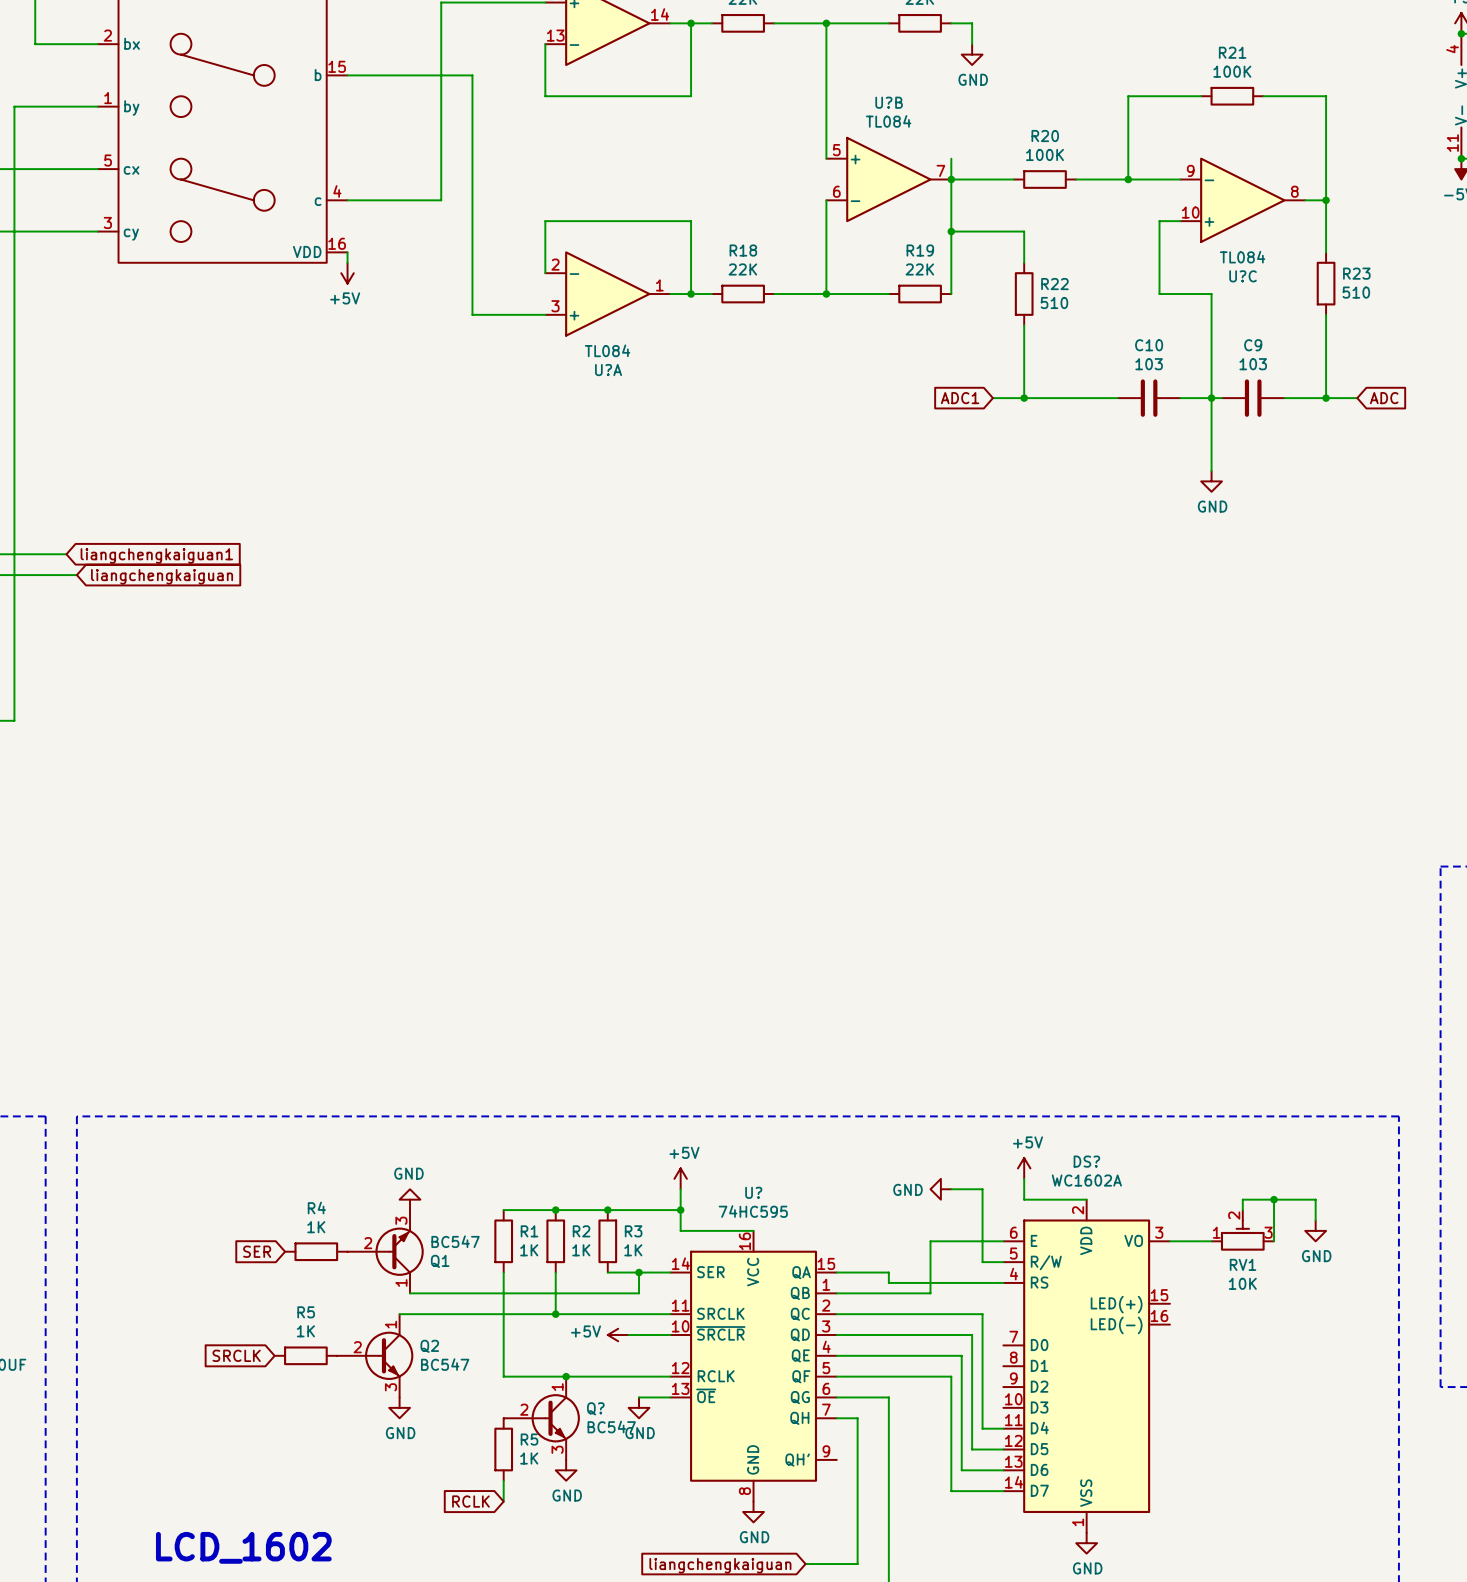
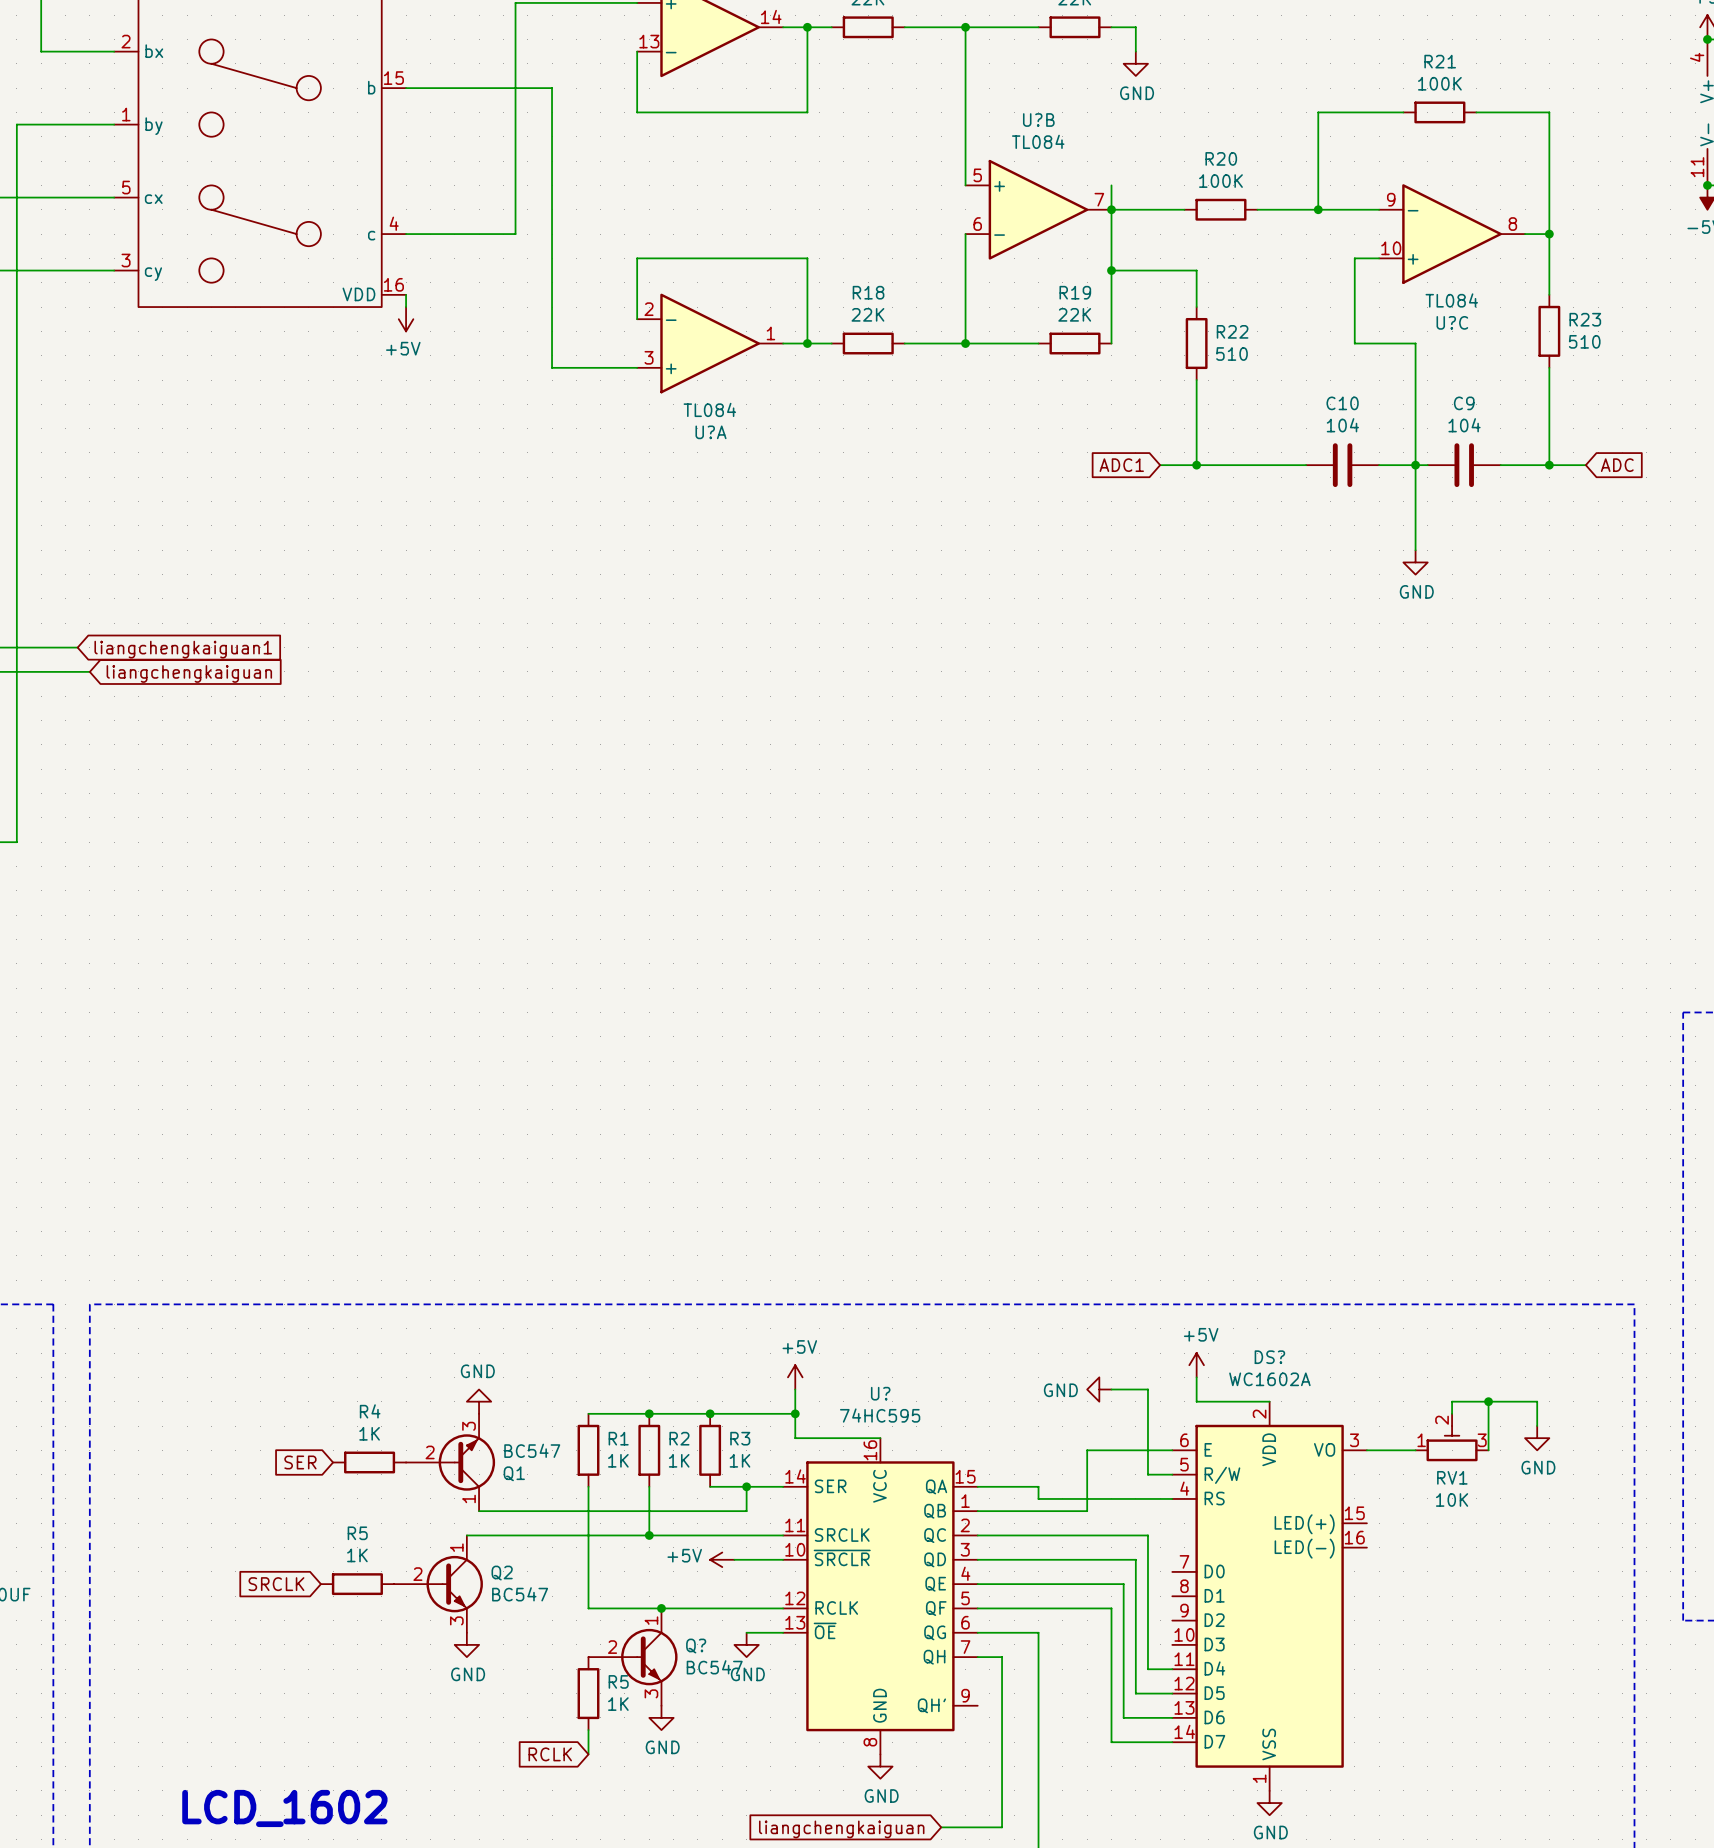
C10 value: 103 (1149, 364) -> 104 (1342, 425)
C9 value: 103 (1253, 364) -> 104 (1464, 425)

